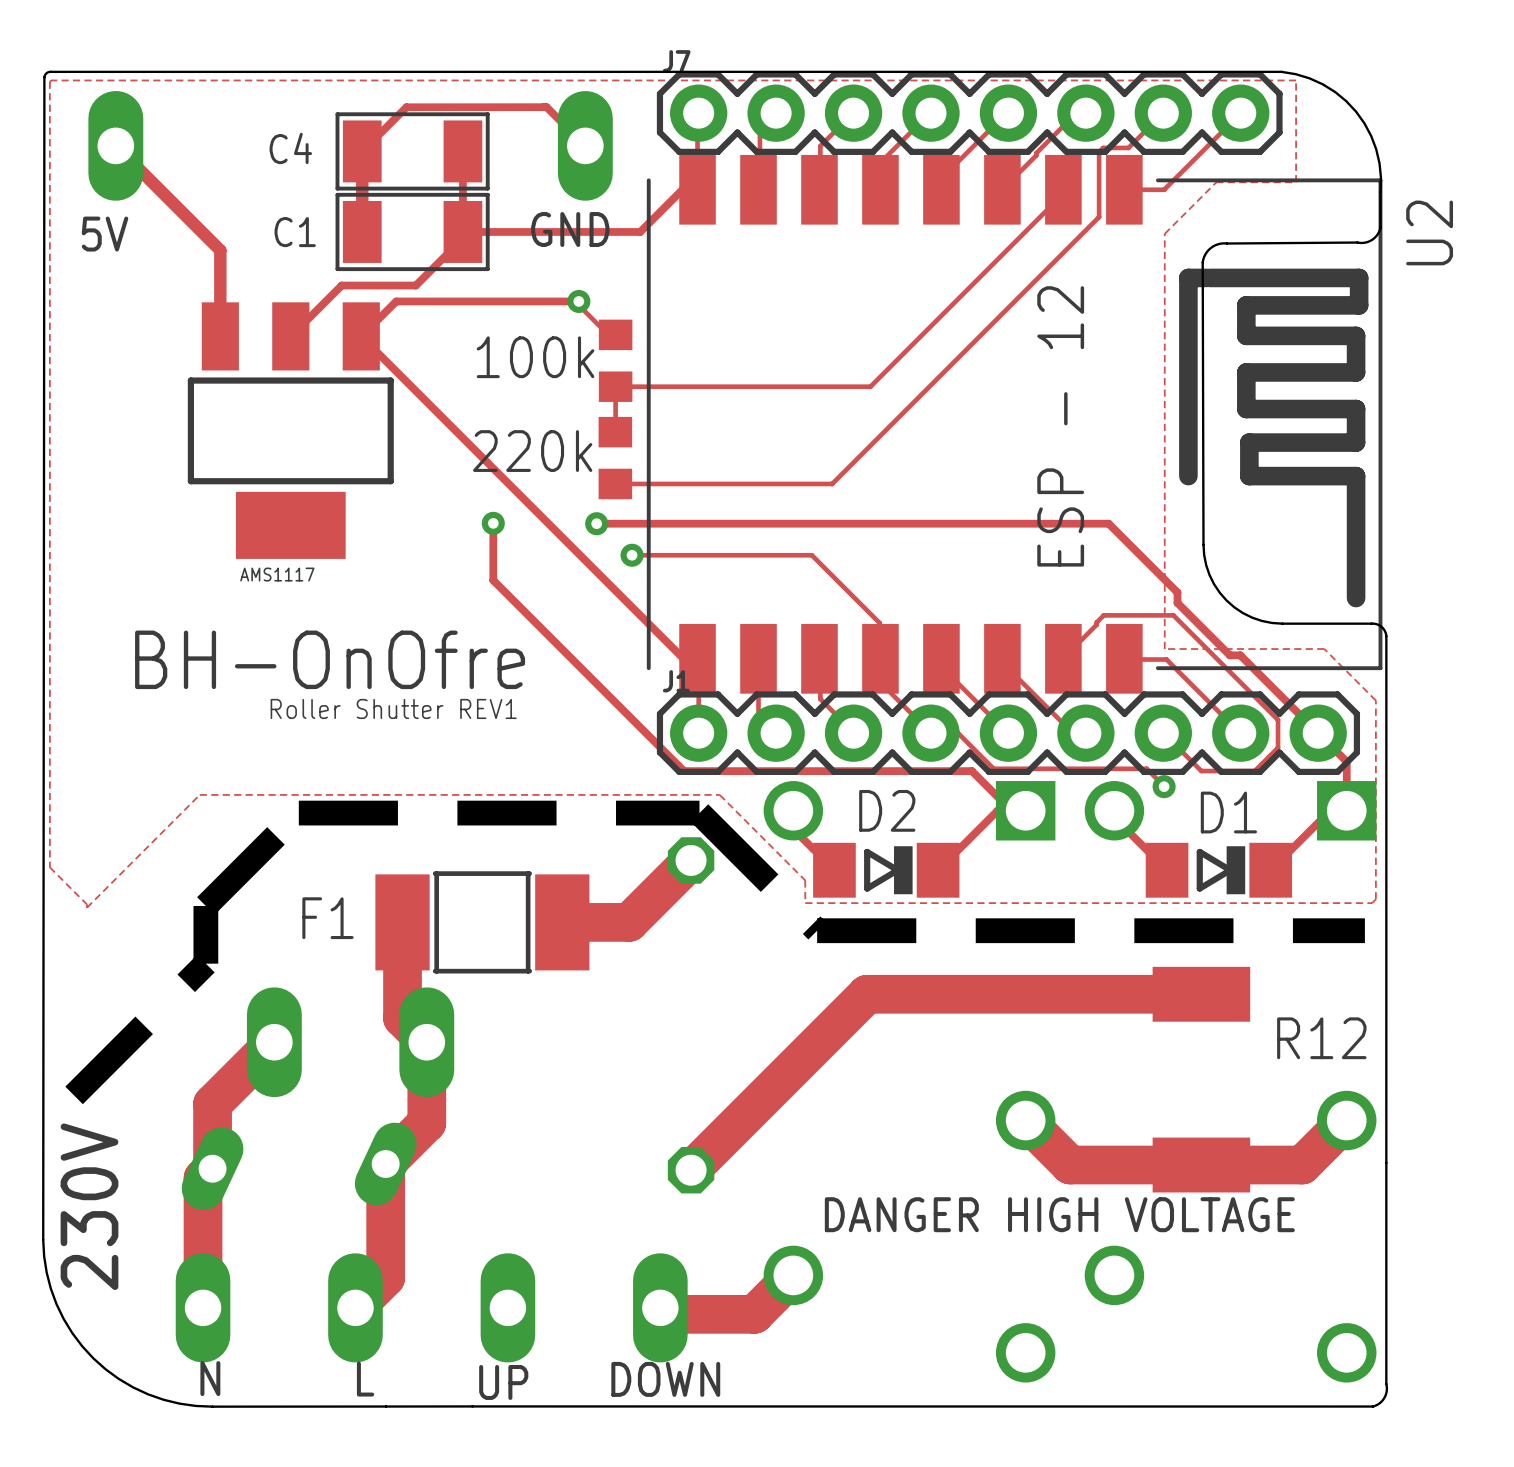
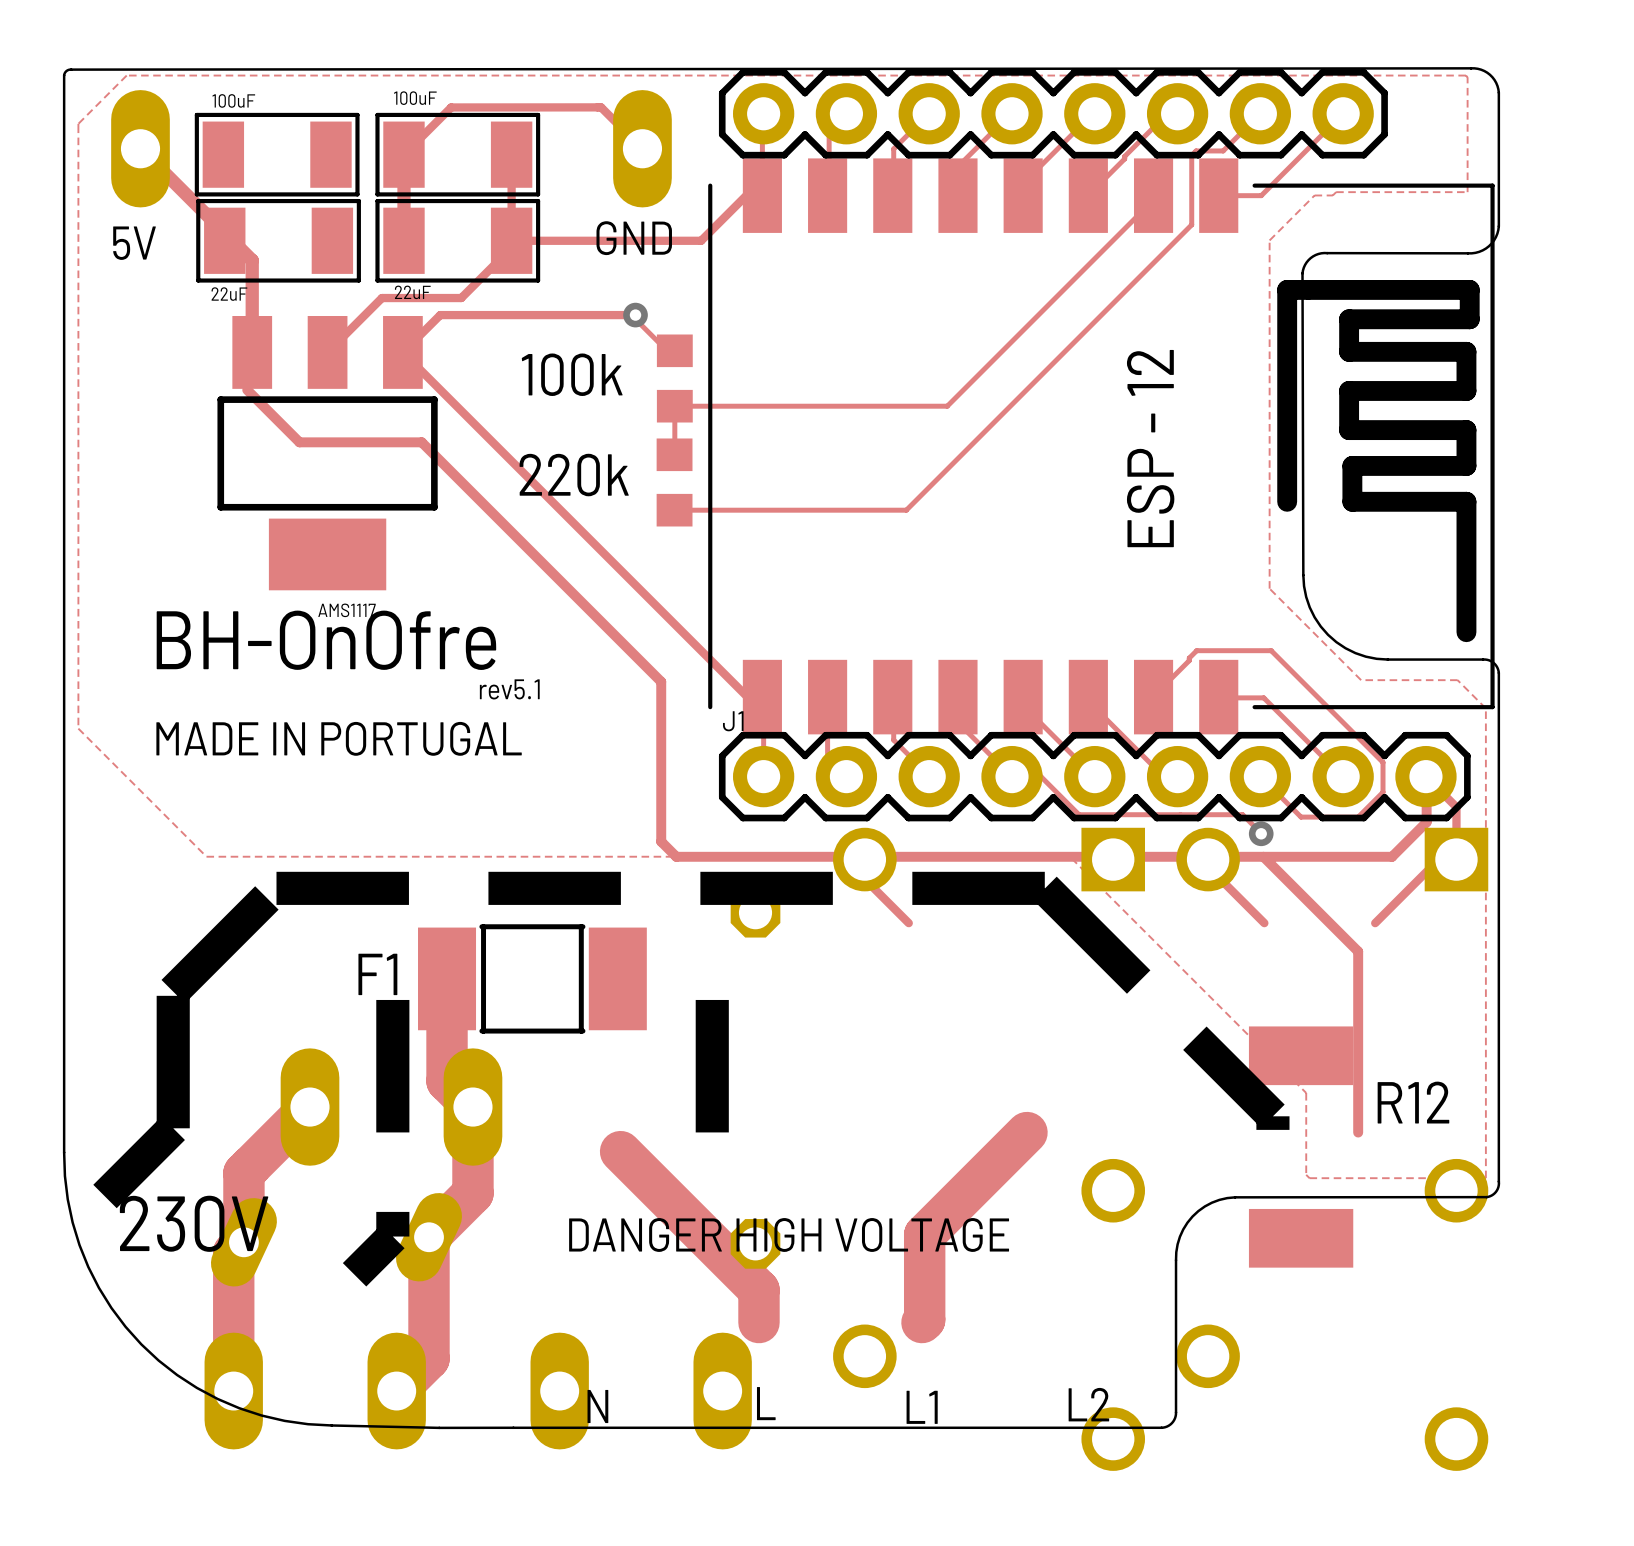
J7 name: J7 (676, 61) -> none
board edge: (51, 71) (1281, 71) (1309, 78) (1335, 91) (1346, 101) (1356, 111) (1371, 136) (1379, 163) (1380, 227) (1375, 236) (1362, 242) (1221, 243) (1208, 249) (1202, 262) -> (71, 69) (1474, 68) (1489, 74) (1496, 82) (1498, 92) (1498, 226) (1491, 243) (1482, 250) (1471, 253) (1321, 253) (1308, 260) (1302, 273)
board edge: (44, 77) (43, 1239) (46, 1272) (56, 1304) (63, 1318) (82, 1346) (105, 1369) (118, 1378) (148, 1394) (179, 1403) (212, 1406) (1373, 1406) (1382, 1400) (1386, 1388) (1386, 1111) -> (64, 75) (64, 1176) (67, 1199) (79, 1245) (98, 1287) (125, 1326) (158, 1360) (177, 1375) (196, 1387) (239, 1408) (284, 1420) (331, 1425) (439, 1427) (1163, 1427) (1171, 1423) (1175, 1414) (1176, 1252) (1183, 1229) (1198, 1211) (1211, 1202) (1235, 1197) (1486, 1197) (1495, 1191) (1498, 1181)
zone outline: (51, 80) (1296, 80) (1296, 182) (1216, 182) (1164, 233) (1164, 649) (1324, 649) (1375, 700) (1375, 899) (1372, 903) (805, 903) (805, 880) (719, 794) (199, 794) (86, 907) (86, 904) (49, 867) (51, 80) -> (126, 75) (78, 123) (78, 728) (206, 856) (1069, 856) (1306, 1092) (1306, 1174) (1309, 1178) (1485, 1178) (1485, 708) (1457, 680) (1361, 680) (1269, 588) (1269, 240) (1314, 195) (1332, 195) (1336, 192) (1467, 192) (1467, 77) (1465, 75) (126, 75)
C4 value: none -> 100uF (415, 98)
C4 name: C4 (290, 148) -> none
part: none -> 100uF (277, 154)
part: none -> 22uF (278, 240)
C1 name: C1 (295, 232) -> none
U2 name: U2 (1429, 232) -> none
C1 value: none -> 22uF (412, 292)
track: (493, 523) (493, 580) (684, 771) (971, 771) (1011, 810) -> none
via: (493, 523) -> none
track: (596, 523) (1108, 523) (1177, 592) (1177, 602) (1229, 655) (1240, 655) (1318, 733) -> (252, 352) (247, 357) (247, 390) (299, 442) (421, 442) (661, 681) (661, 841) (676, 856) (1392, 856) (1426, 822) (1425, 776)
via: (596, 523) -> none
track: (632, 555) (811, 555) (879, 623) (880, 670) -> none
via: (632, 555) -> none
AMS1117 name position: AMS1117 (277, 574) -> AMS1117 (347, 610)
text: none -> rev5.1 (509, 689)
text position: BH-OnOfre (330, 659) -> BH-OnOfre (326, 640)
text: none -> MADE IN PORTUGAL (339, 738)
text: Roller Shutter REV1 (393, 708) -> none
track: none -> (1263, 856) (1358, 951) (1358, 1132)
track: (1025, 810) (997, 810) (938, 870) -> none
track: (691, 860) (629, 922) (562, 922) -> none
D2: (886, 870) -> none
D1: (1218, 870) -> none
board edge: (1364, 930) (817, 930) (699, 813) (298, 813) (205, 906) (205, 963) (74, 1095) -> none
board edge: none -> (392, 999) (392, 1236) (354, 1274)
board edge: none -> (712, 999) (712, 1158)
track: (1201, 994) (867, 994) (691, 1170) -> none
board edge: none -> (1272, 1129) (1272, 1116) (1045, 888) (276, 888) (173, 991) (173, 1128) (105, 1196)
track: none -> (1027, 1132) (924, 1234) (924, 1319) (921, 1322)
track: none -> (620, 1151) (758, 1290) (758, 1322)
track: (1025, 1120) (1070, 1165) (1302, 1165) (1346, 1120) -> none
text rotation: 0° (89, 1206) -> 90° clockwise (194, 1223)
text position: DANGER HIGH VOLTAGE (1059, 1214) -> DANGER HIGH VOLTAGE (789, 1234)
track: (793, 1275) (754, 1314) (666, 1314) (660, 1307) -> none
text: none -> L2 (1088, 1404)
text: none -> L1 (922, 1407)
text position: N (210, 1378) -> N (597, 1406)
text position: L (365, 1379) -> L (766, 1403)
text: DOWN (665, 1379) -> none
text: UP (503, 1382) -> none

